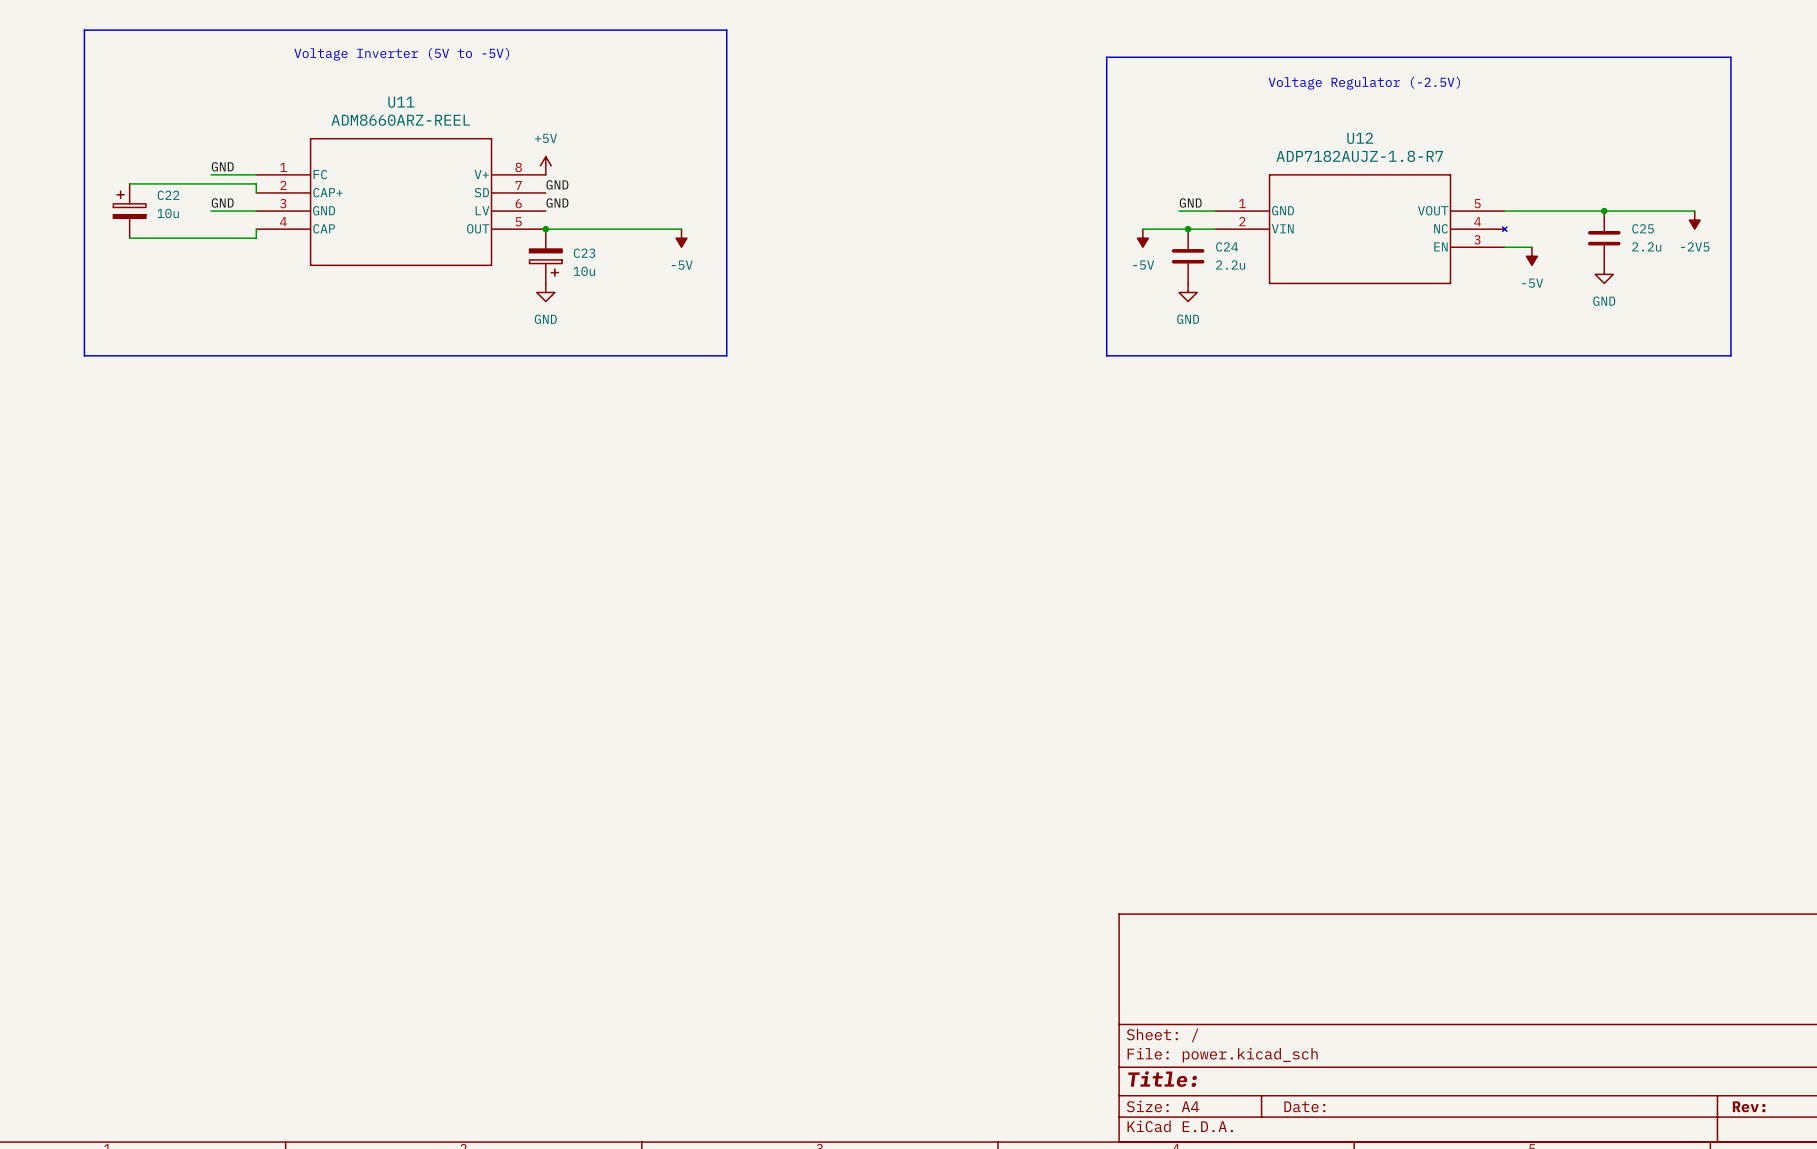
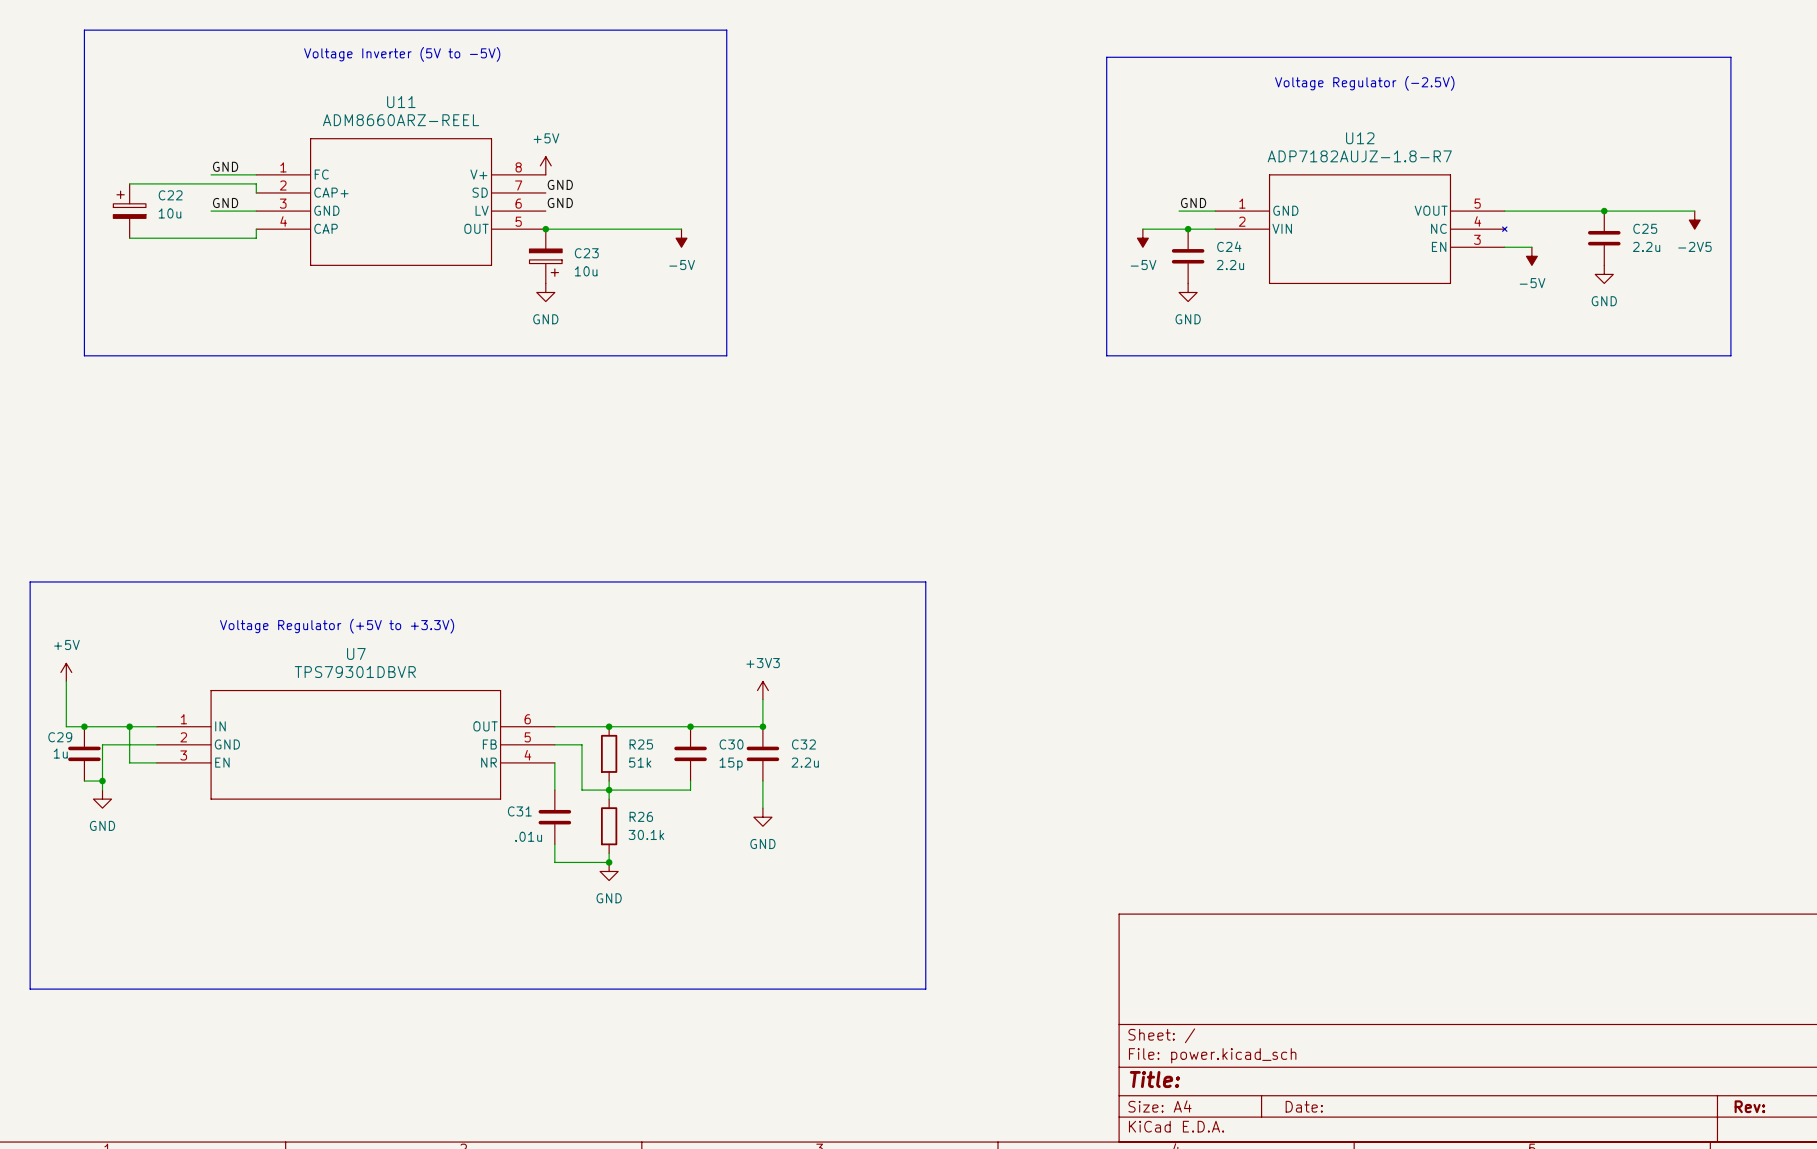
line: none -> (30, 581) (925, 581) (925, 989) (30, 989) (30, 581)
text: none -> Voltage Regulator (+5V to +3.3V) (337, 626)
power symbol: none -> +5V (66, 672)
wire: none -> (66, 681) (66, 726) (156, 726)
power symbol: none -> +3V3 (762, 690)
wire: none -> (762, 699) (762, 726) (554, 726)
junction: none -> (84, 726)
wire: none -> (129, 726) (129, 762) (156, 762)
junction: none -> (129, 726)
junction: none -> (609, 726)
junction: none -> (690, 726)
junction: none -> (762, 726)
wire: none -> (156, 744) (102, 744) (102, 790)
U7: none -> TPS79301DBVR (355, 744)
wire: none -> (554, 744) (581, 744) (581, 790) (690, 790) (690, 781)
C29: none -> 1u (84, 753)
R25: none -> 51k (609, 753)
C30: none -> 15p (690, 753)
C32: none -> 2.2u (762, 753)
wire: none -> (554, 762) (554, 790)
wire: none -> (84, 781) (102, 781)
junction: none -> (102, 781)
wire: none -> (609, 781) (609, 799)
wire: none -> (762, 781) (762, 808)
junction: none -> (609, 790)
power symbol: none -> GND (102, 799)
C31: none -> .01u (554, 817)
power symbol: none -> GND (762, 817)
R26: none -> 30.1k (609, 826)
wire: none -> (554, 844) (554, 862) (609, 862) (609, 853)
junction: none -> (609, 862)
power symbol: none -> GND (609, 871)

